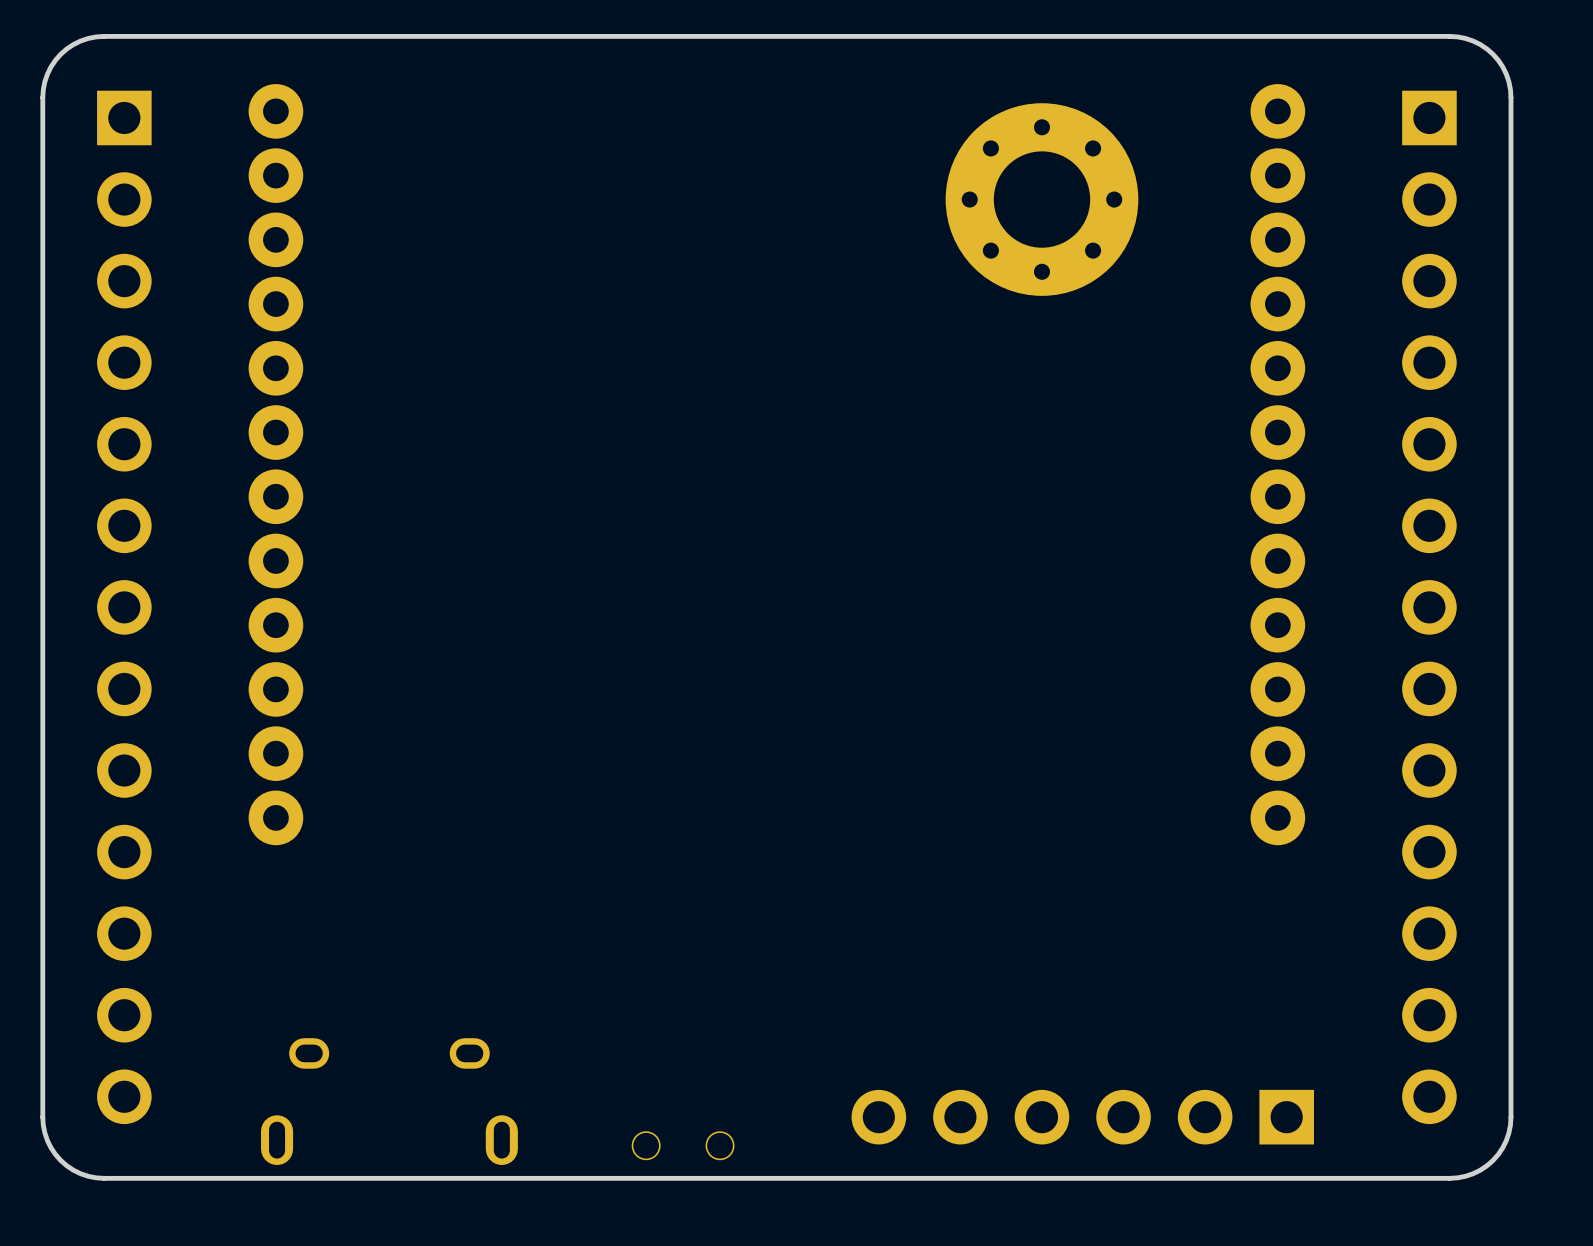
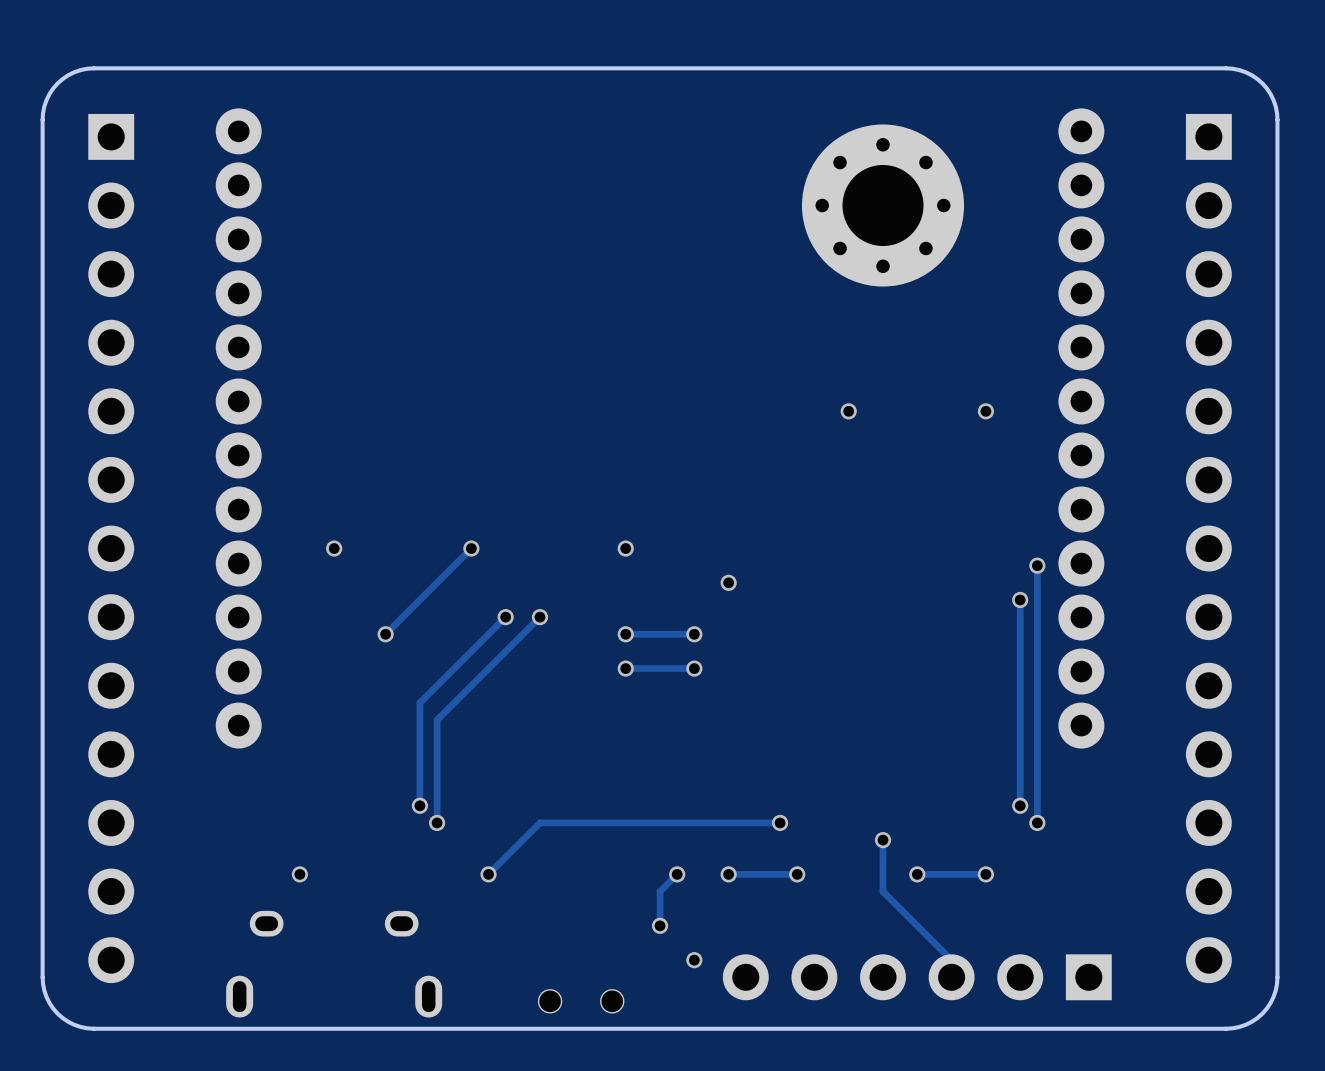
via: none -> (848, 411)
via: none -> (985, 411)
via: none -> (334, 548)
track: none -> (471, 548) (385, 634)
via: none -> (471, 548)
via: none -> (625, 548)
track: none -> (1037, 565) (1037, 822)
via: none -> (1037, 565)
via: none -> (728, 582)
track: none -> (1020, 599) (1020, 805)
via: none -> (1020, 599)
track: none -> (505, 617) (419, 702) (419, 805)
via: none -> (505, 617)
track: none -> (539, 617) (437, 720) (437, 822)
via: none -> (539, 617)
via: none -> (385, 634)
via: none -> (625, 634)
track: none -> (694, 634) (625, 634)
via: none -> (694, 634)
via: none -> (625, 668)
track: none -> (694, 668) (625, 668)
via: none -> (694, 668)
via: none -> (419, 805)
via: none -> (1020, 805)
via: none -> (437, 822)
track: none -> (780, 822) (539, 822) (488, 874)
via: none -> (780, 822)
via: none -> (1037, 822)
track: none -> (883, 840) (883, 891) (951, 960) (951, 977)
via: none -> (883, 840)
via: none -> (299, 874)
via: none -> (488, 874)
track: none -> (677, 874) (660, 891) (660, 925)
via: none -> (677, 874)
via: none -> (728, 874)
track: none -> (797, 874) (728, 874)
via: none -> (797, 874)
via: none -> (917, 874)
track: none -> (985, 874) (917, 874)
via: none -> (985, 874)
via: none -> (660, 925)
via: none -> (694, 960)

